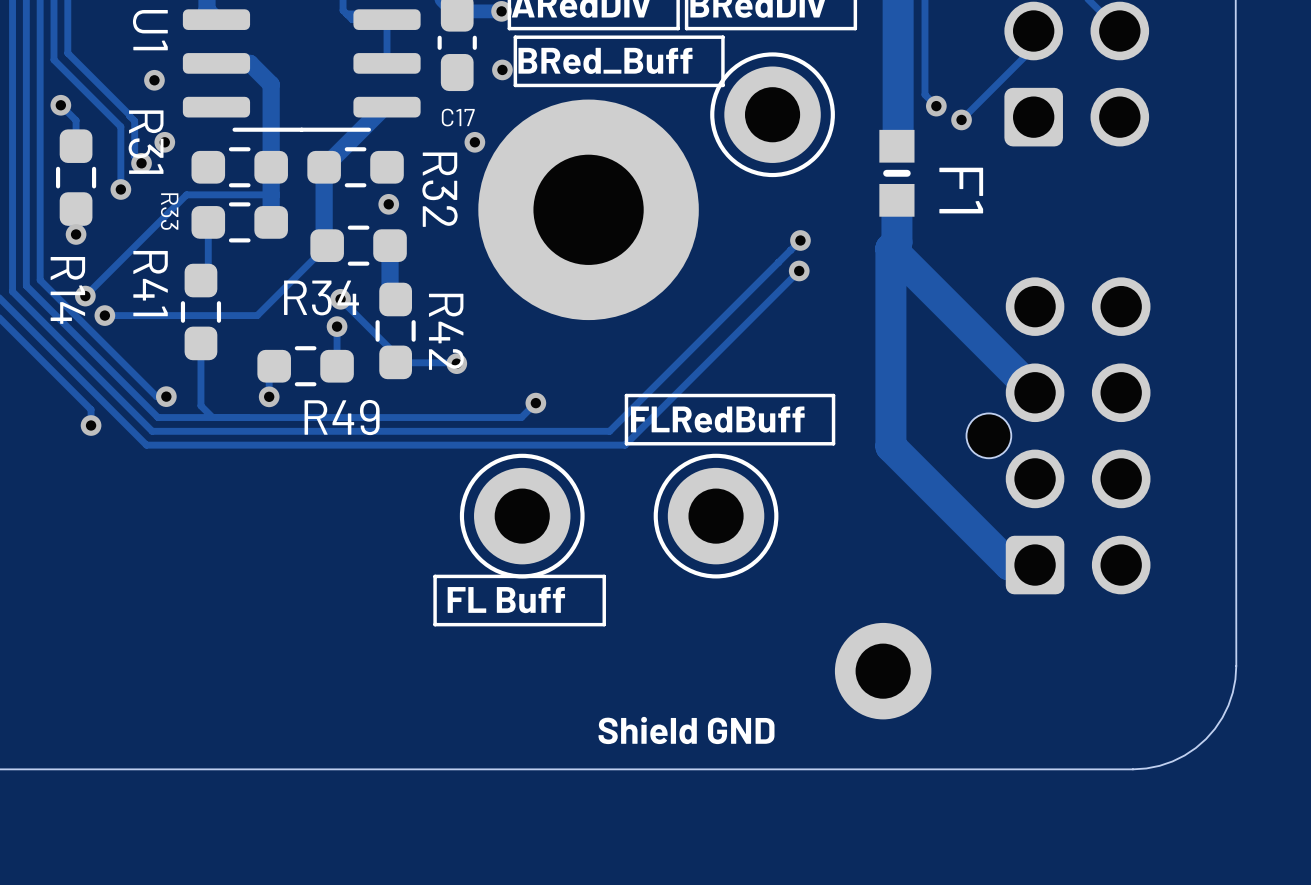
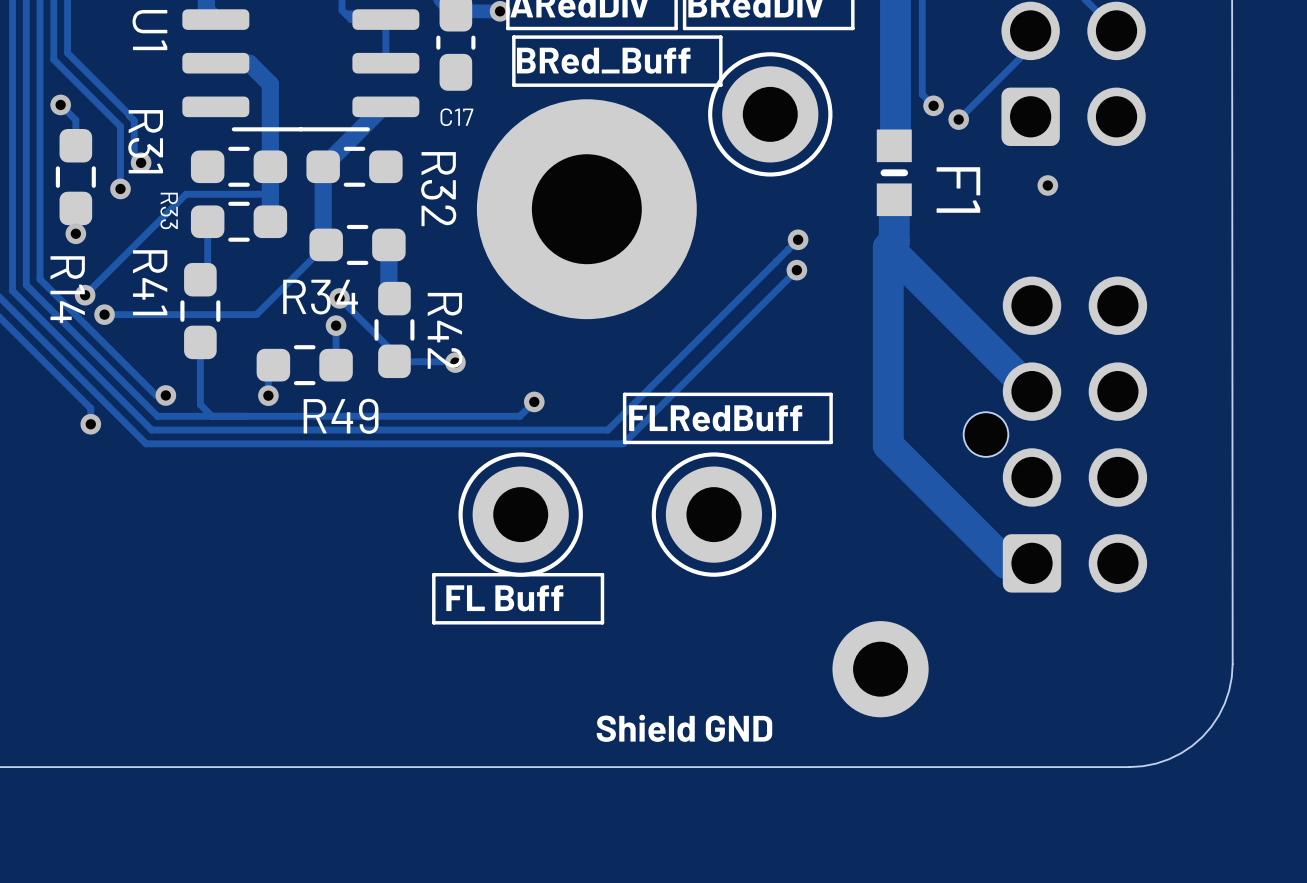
via: (502, 69) -> none
via: (154, 80) -> none
via: (164, 142) -> none
via: (474, 142) -> none
via: none -> (1047, 185)
via: (388, 204) -> none

